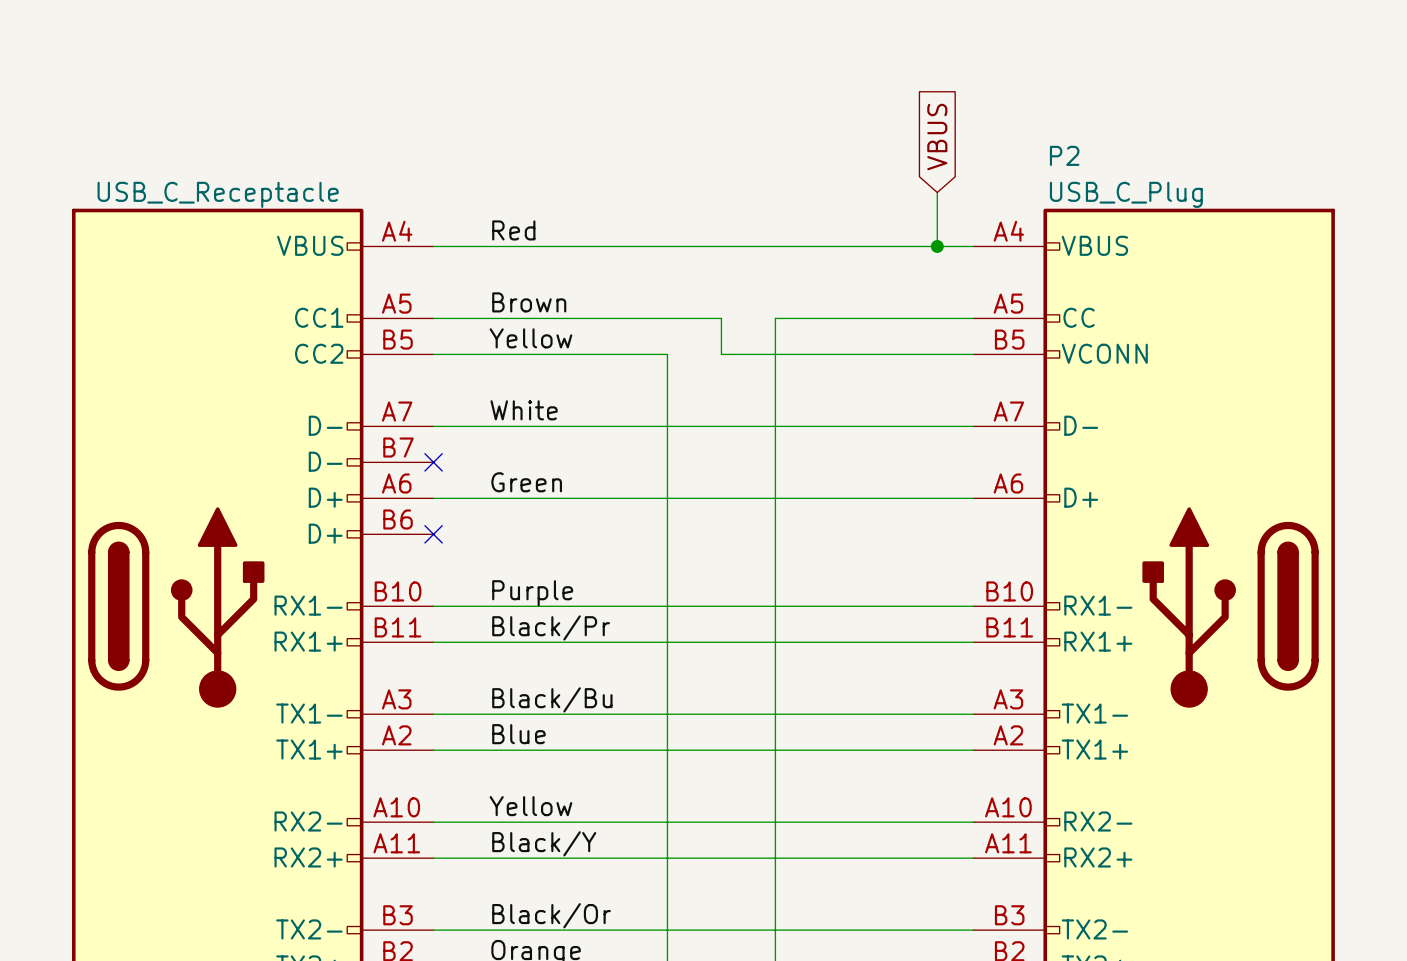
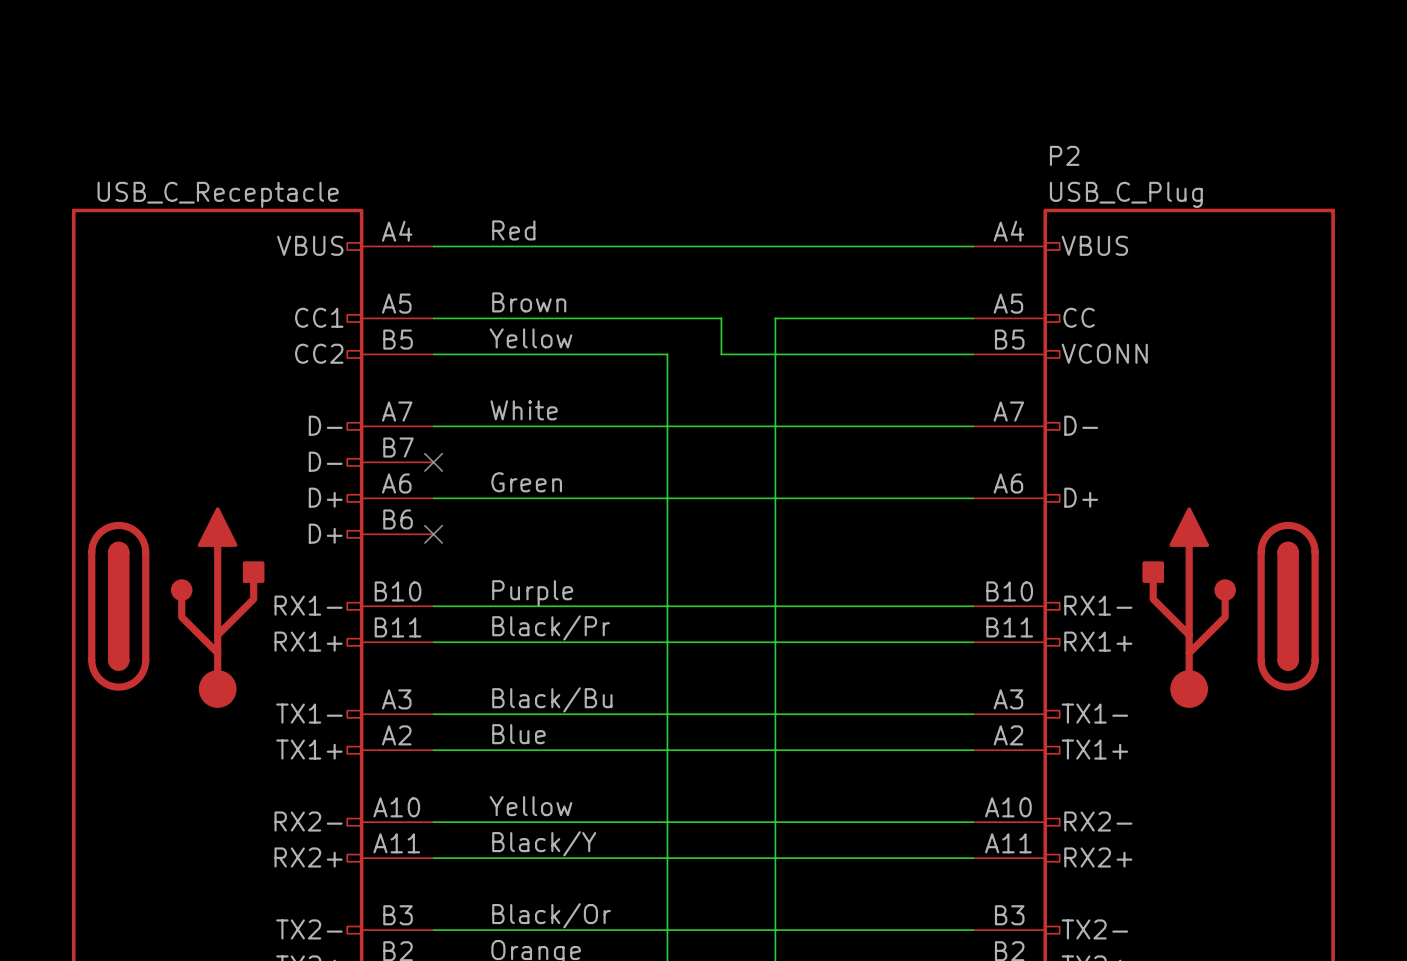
global label: VBUS (937, 137) -> none
wire: (937, 192) (937, 246) -> none
junction: (937, 246) -> none

